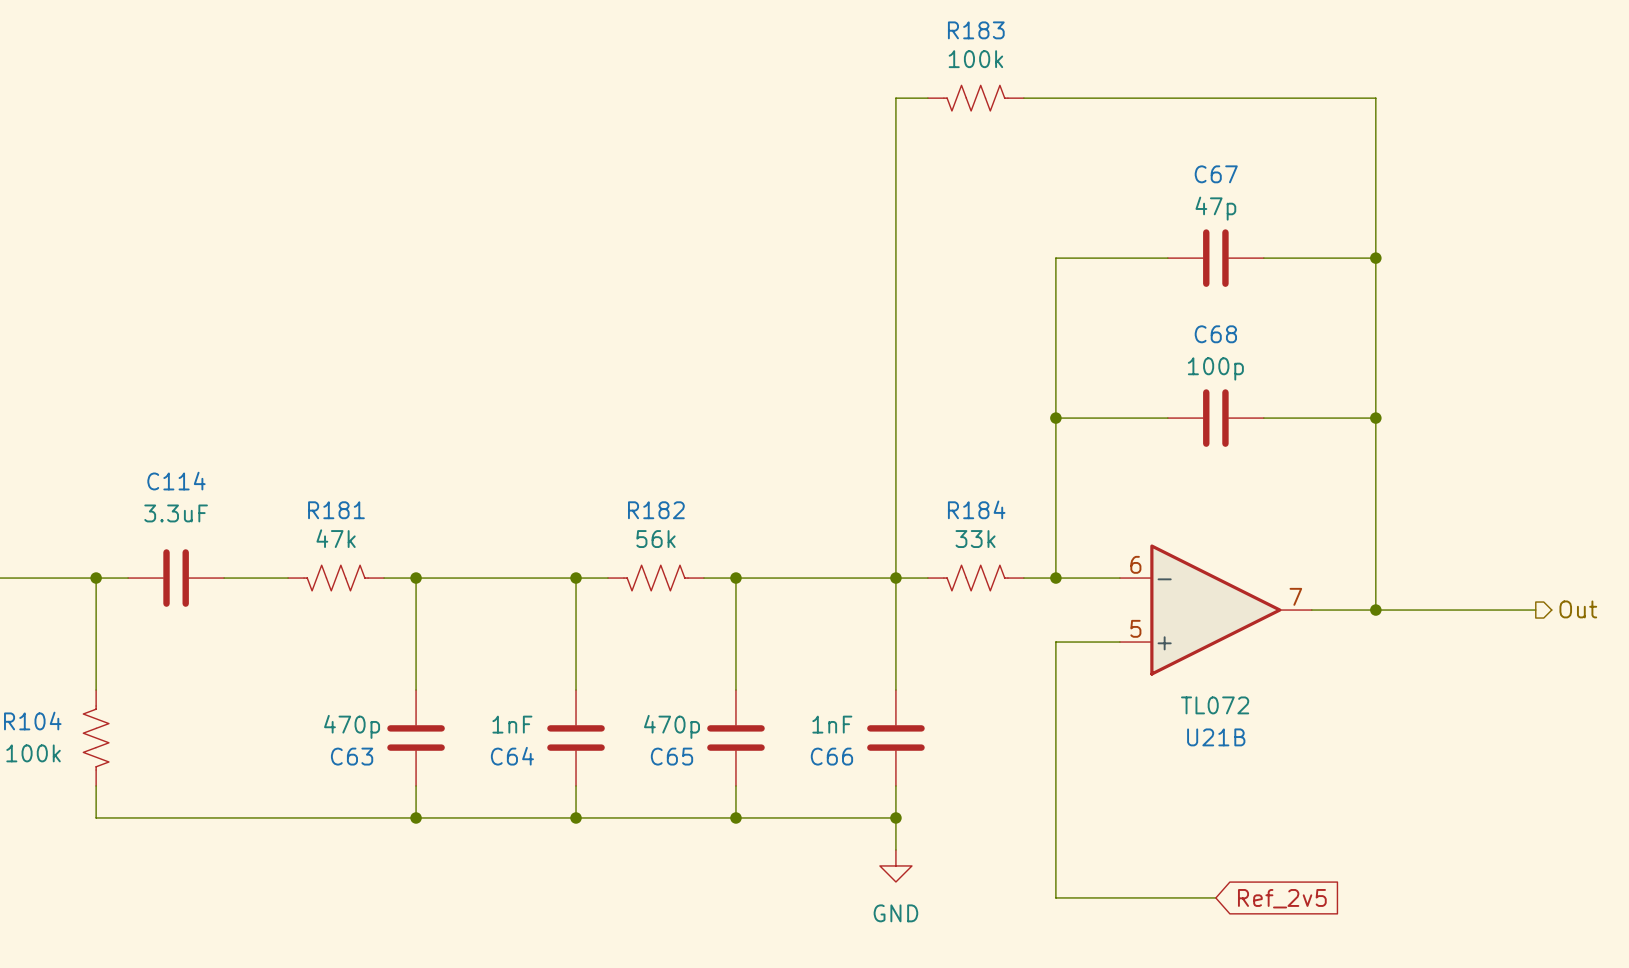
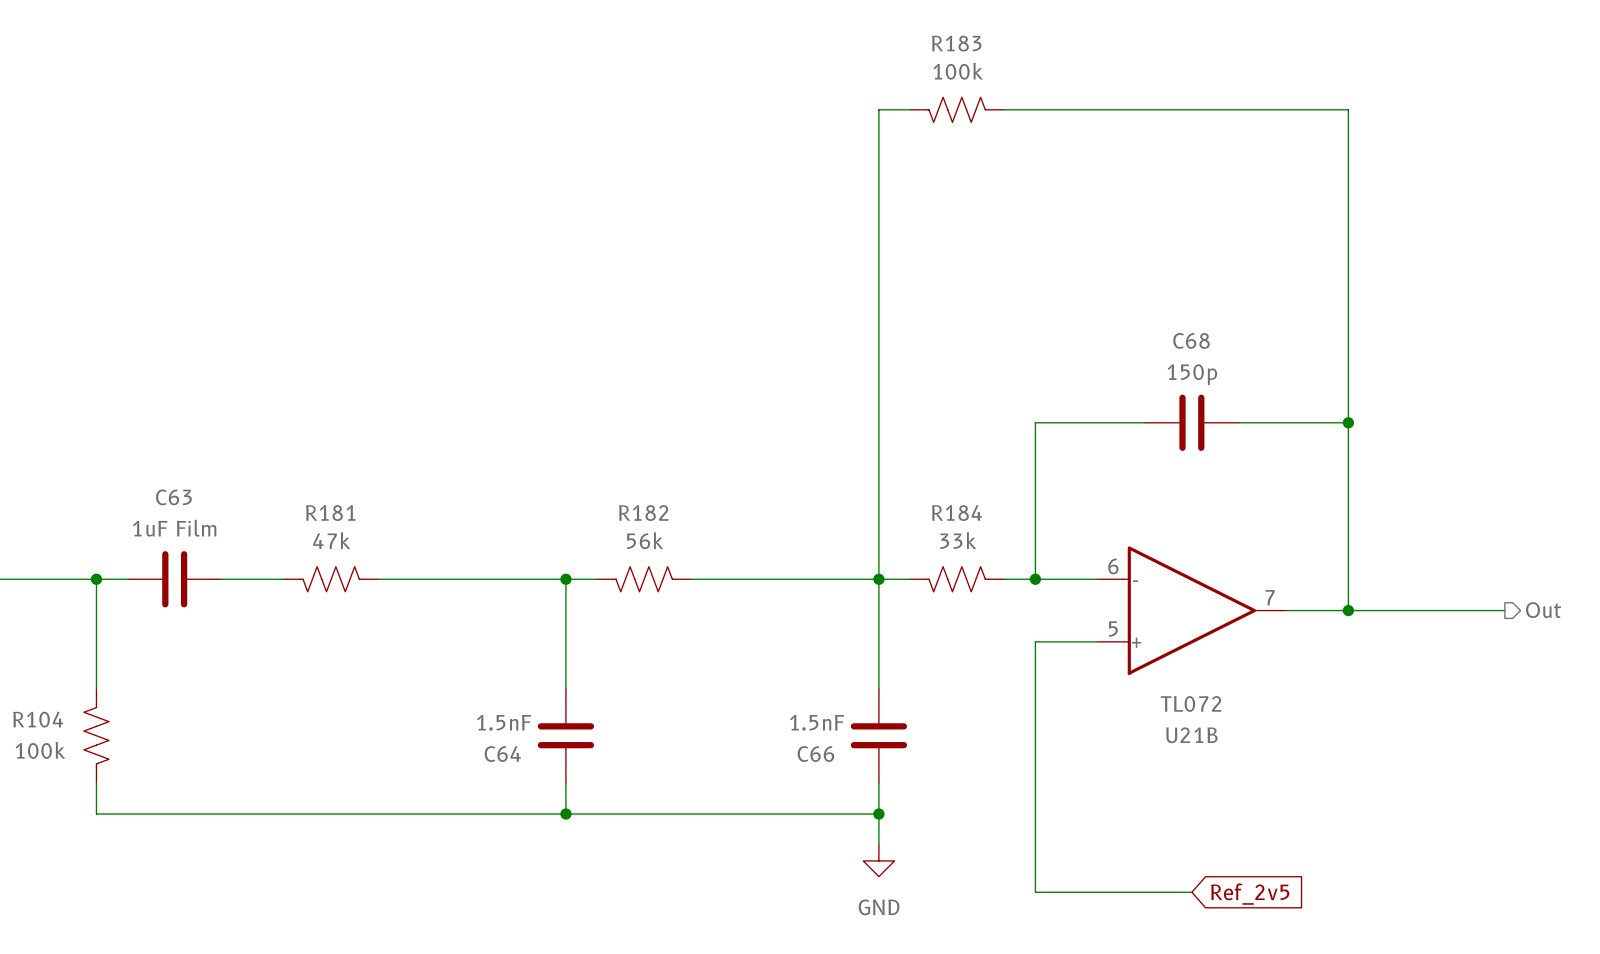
wire: (1167, 258) (1055, 258) (1055, 418) -> none
C67: 47p (1215, 258) -> none
wire: (1263, 258) (1375, 258) -> none
junction: (1375, 258) -> none
C68 value: 100p (1215, 368) -> 150p (1192, 374)
junction: (1055, 418) -> none
C114 name: C114 (176, 481) -> C63 (173, 497)
C114 value: 3.3uF (176, 513) -> 1uF Film (174, 528)
wire: (416, 578) (416, 690) -> none
junction: (416, 578) -> none
wire: (735, 578) (735, 690) -> none
junction: (735, 578) -> none
C64 value: 1nF (512, 724) -> 1.5nF (504, 722)
C66 value: 1nF (832, 724) -> 1.5nF (817, 722)
C63: 470p (416, 738) -> none
C65: 470p (735, 738) -> none
wire: (416, 785) (416, 817) -> none
wire: (735, 785) (735, 817) -> none
junction: (416, 817) -> none
junction: (735, 817) -> none

